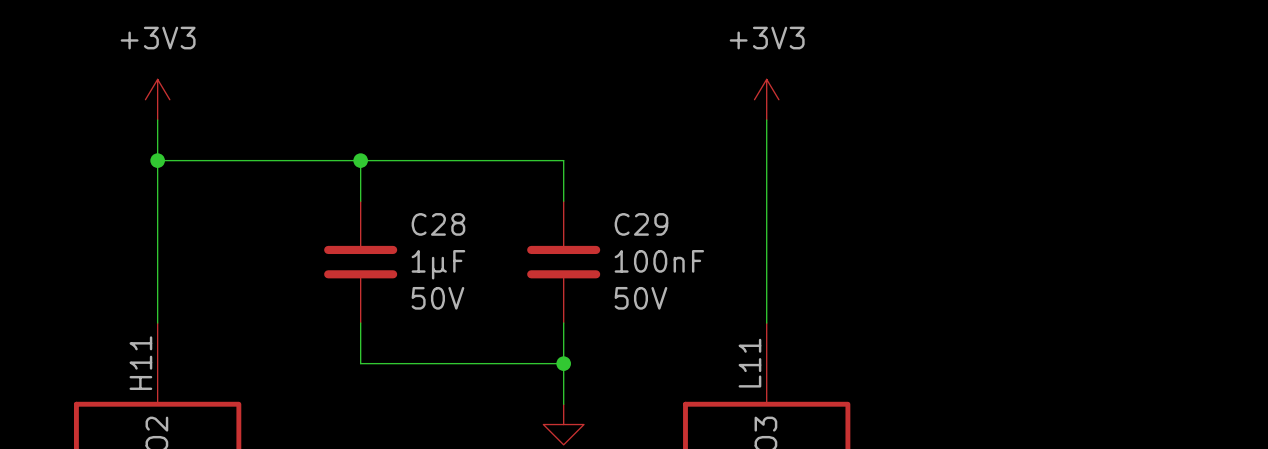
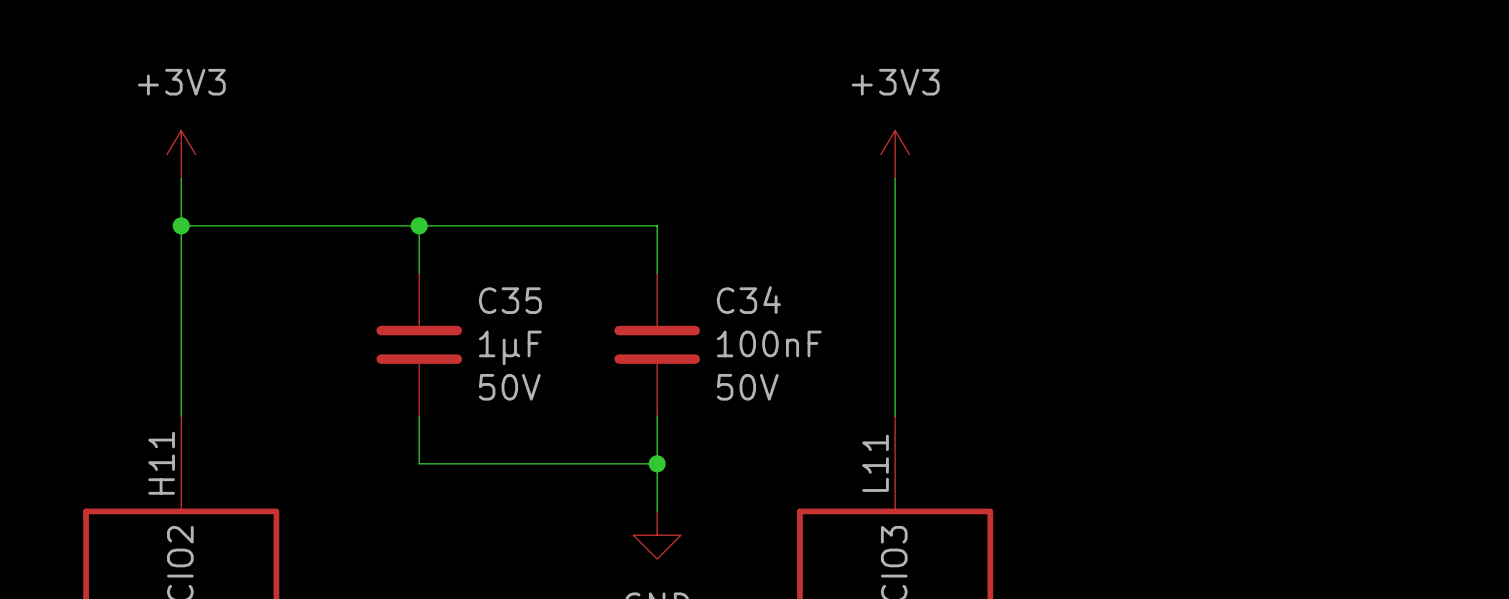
C28 name: C28 (438, 224) -> C35 (510, 300)
C29 name: C29 (641, 224) -> C34 (748, 300)

